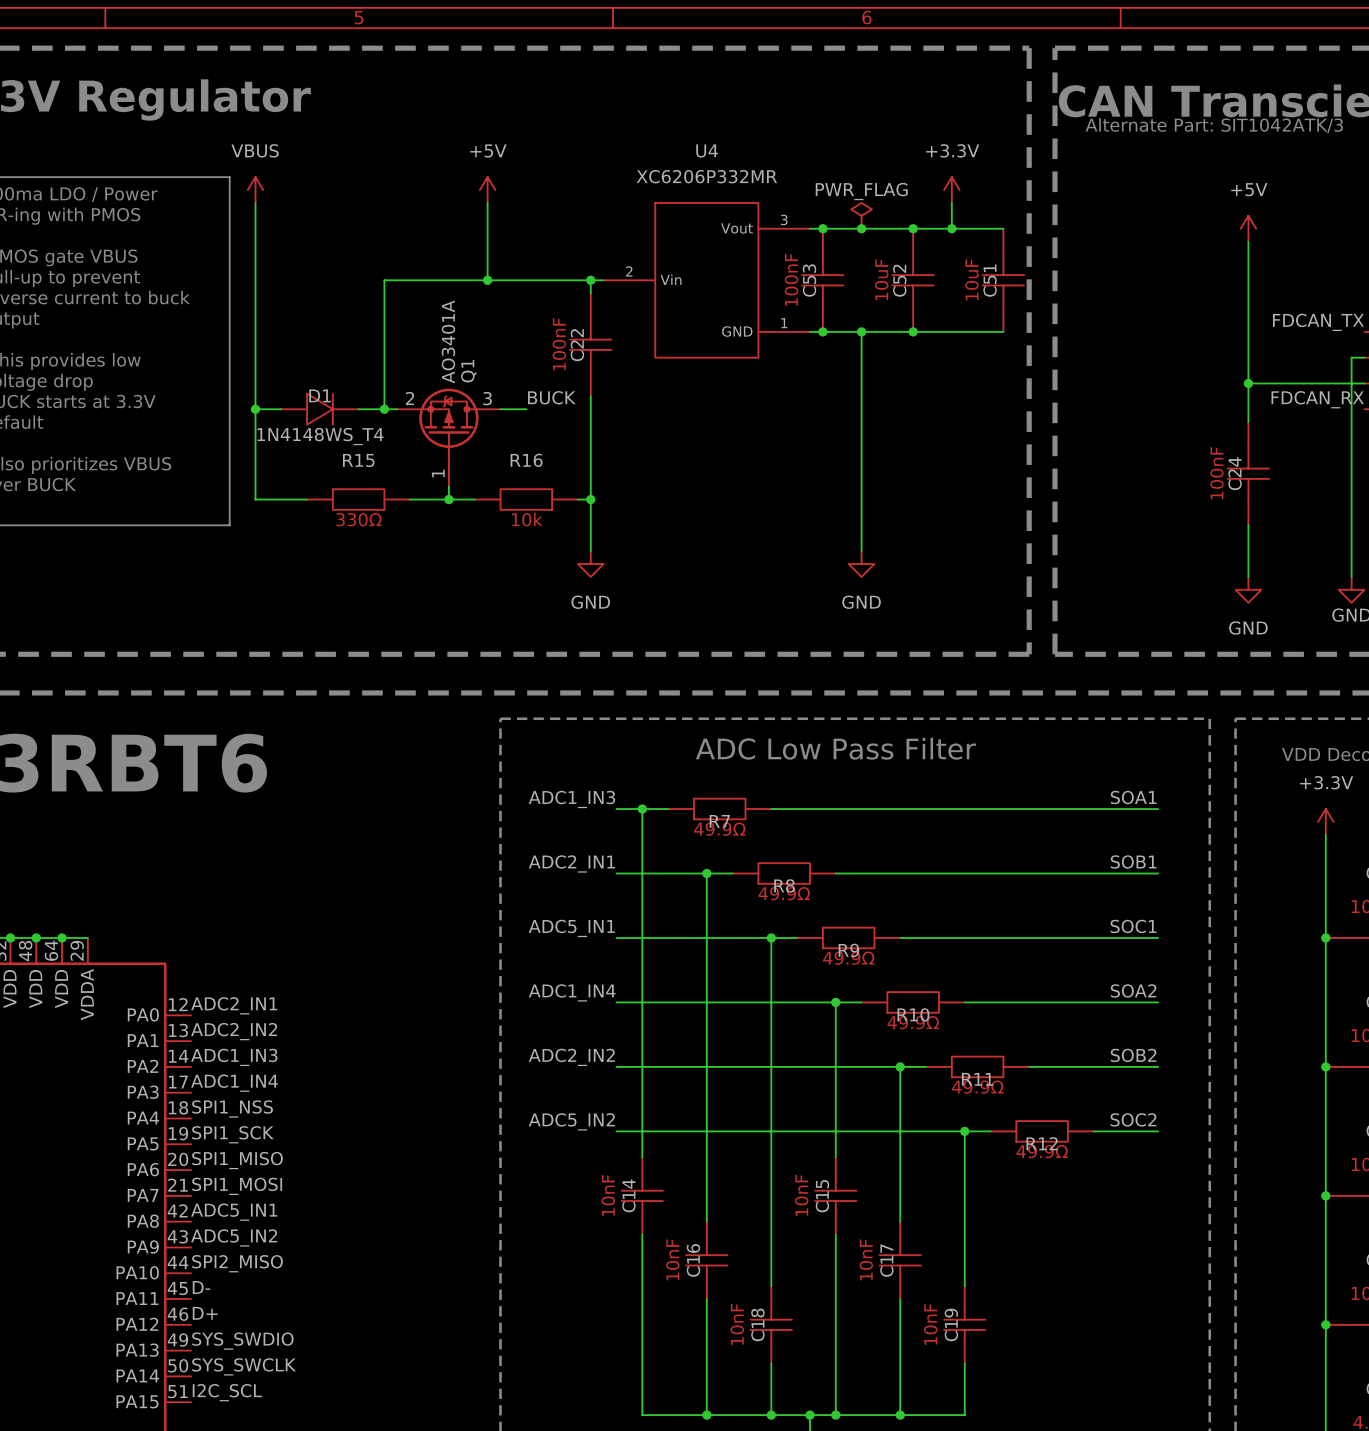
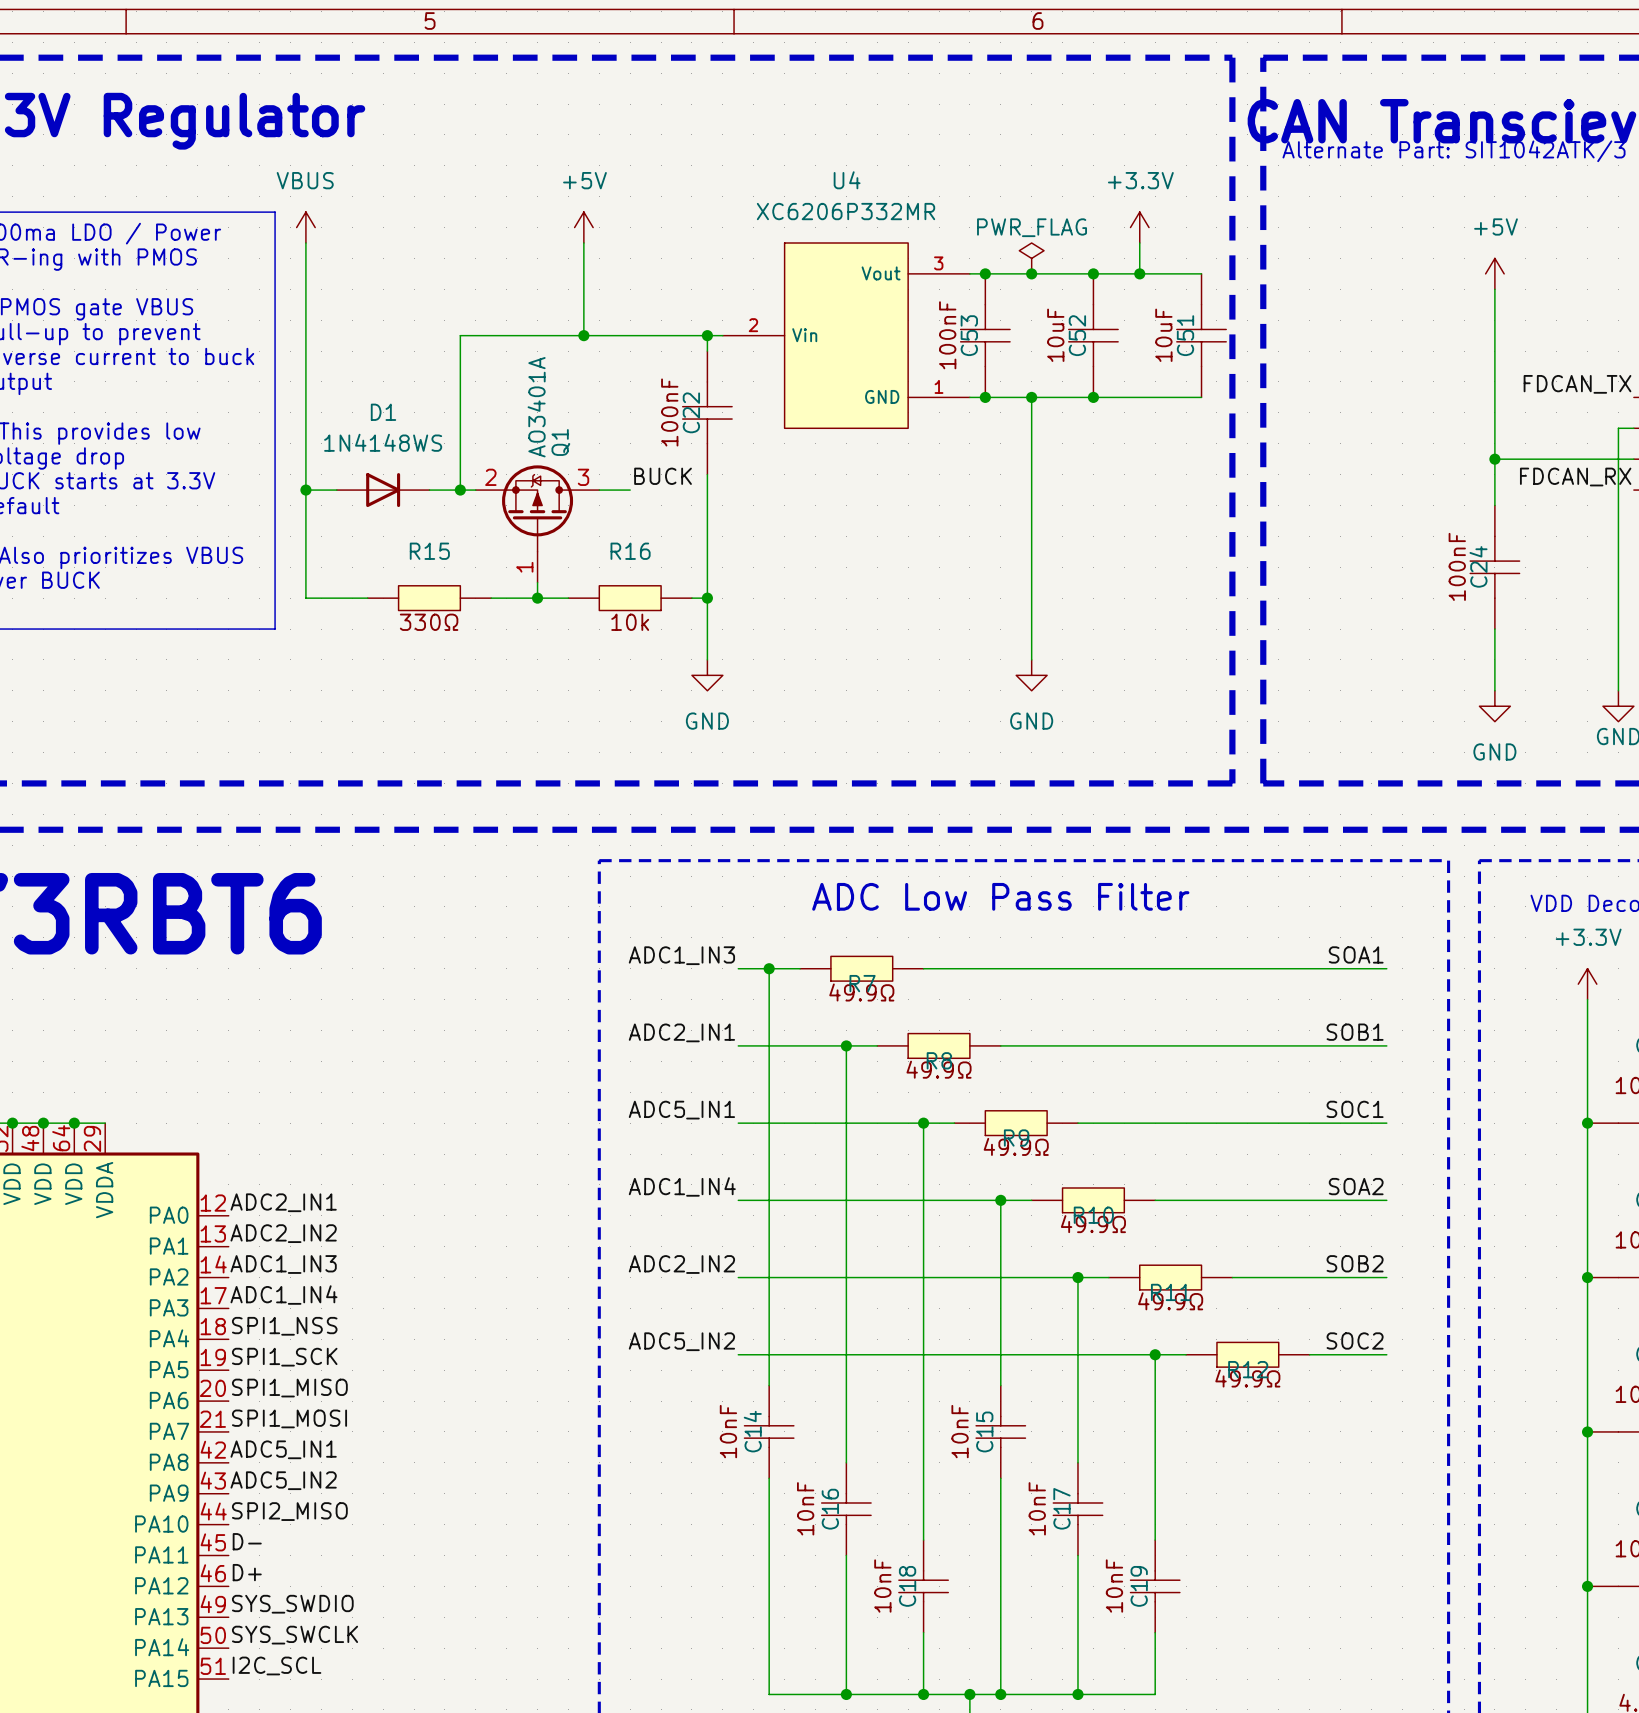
D1 symbol: [281, 393, 359, 425] -> [336, 473, 430, 508]
D1 name position: D1 (320, 395) -> D1 (383, 412)
D1 value: 1N4148WS_T4 (320, 436) -> 1N4148WS (383, 442)

